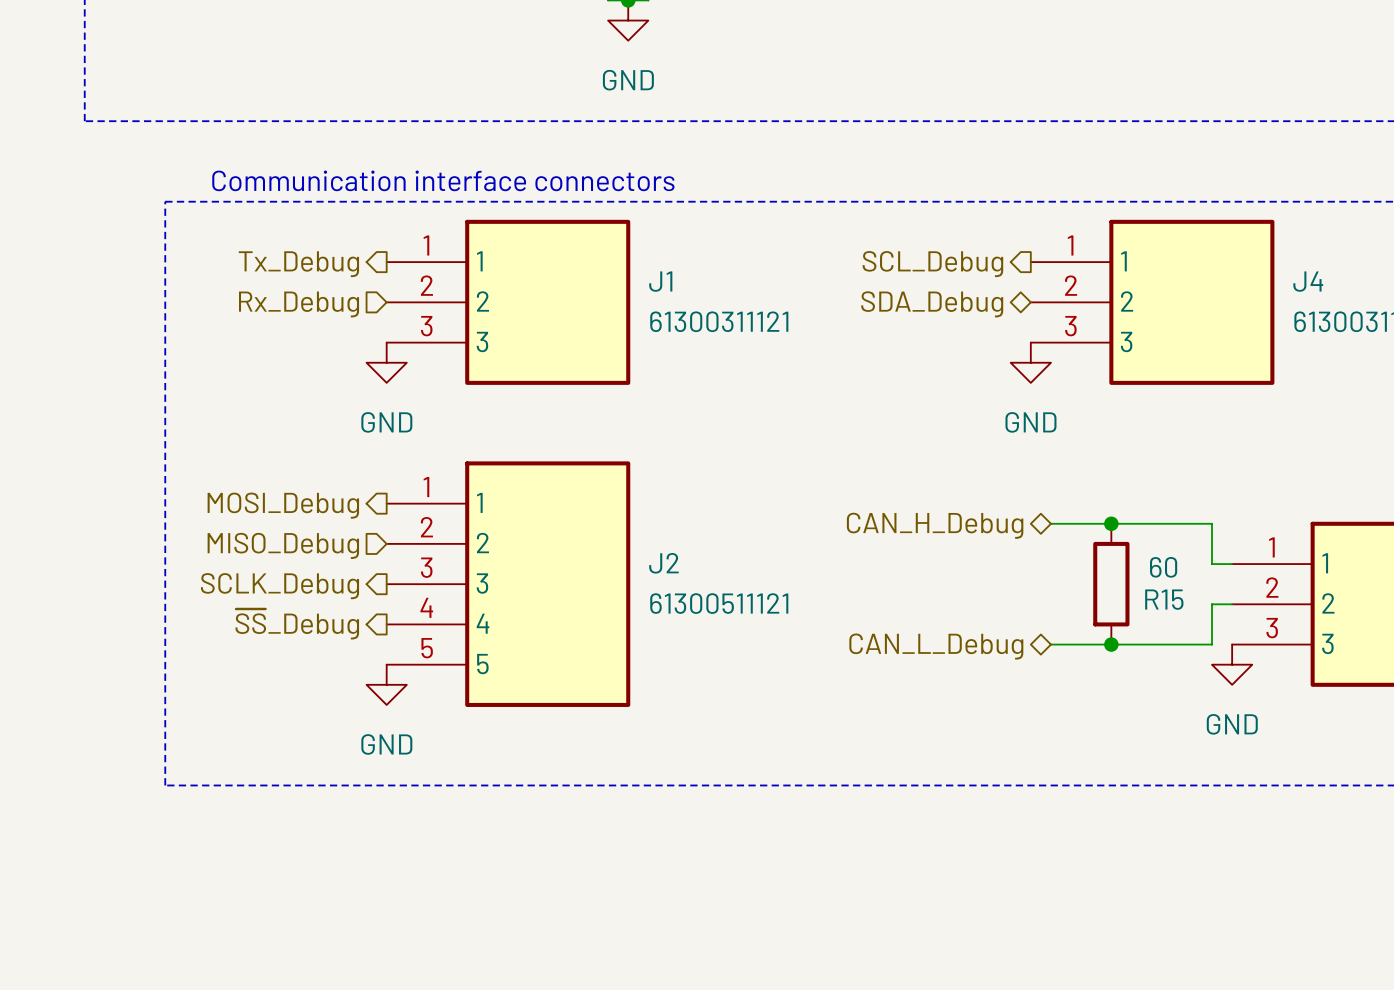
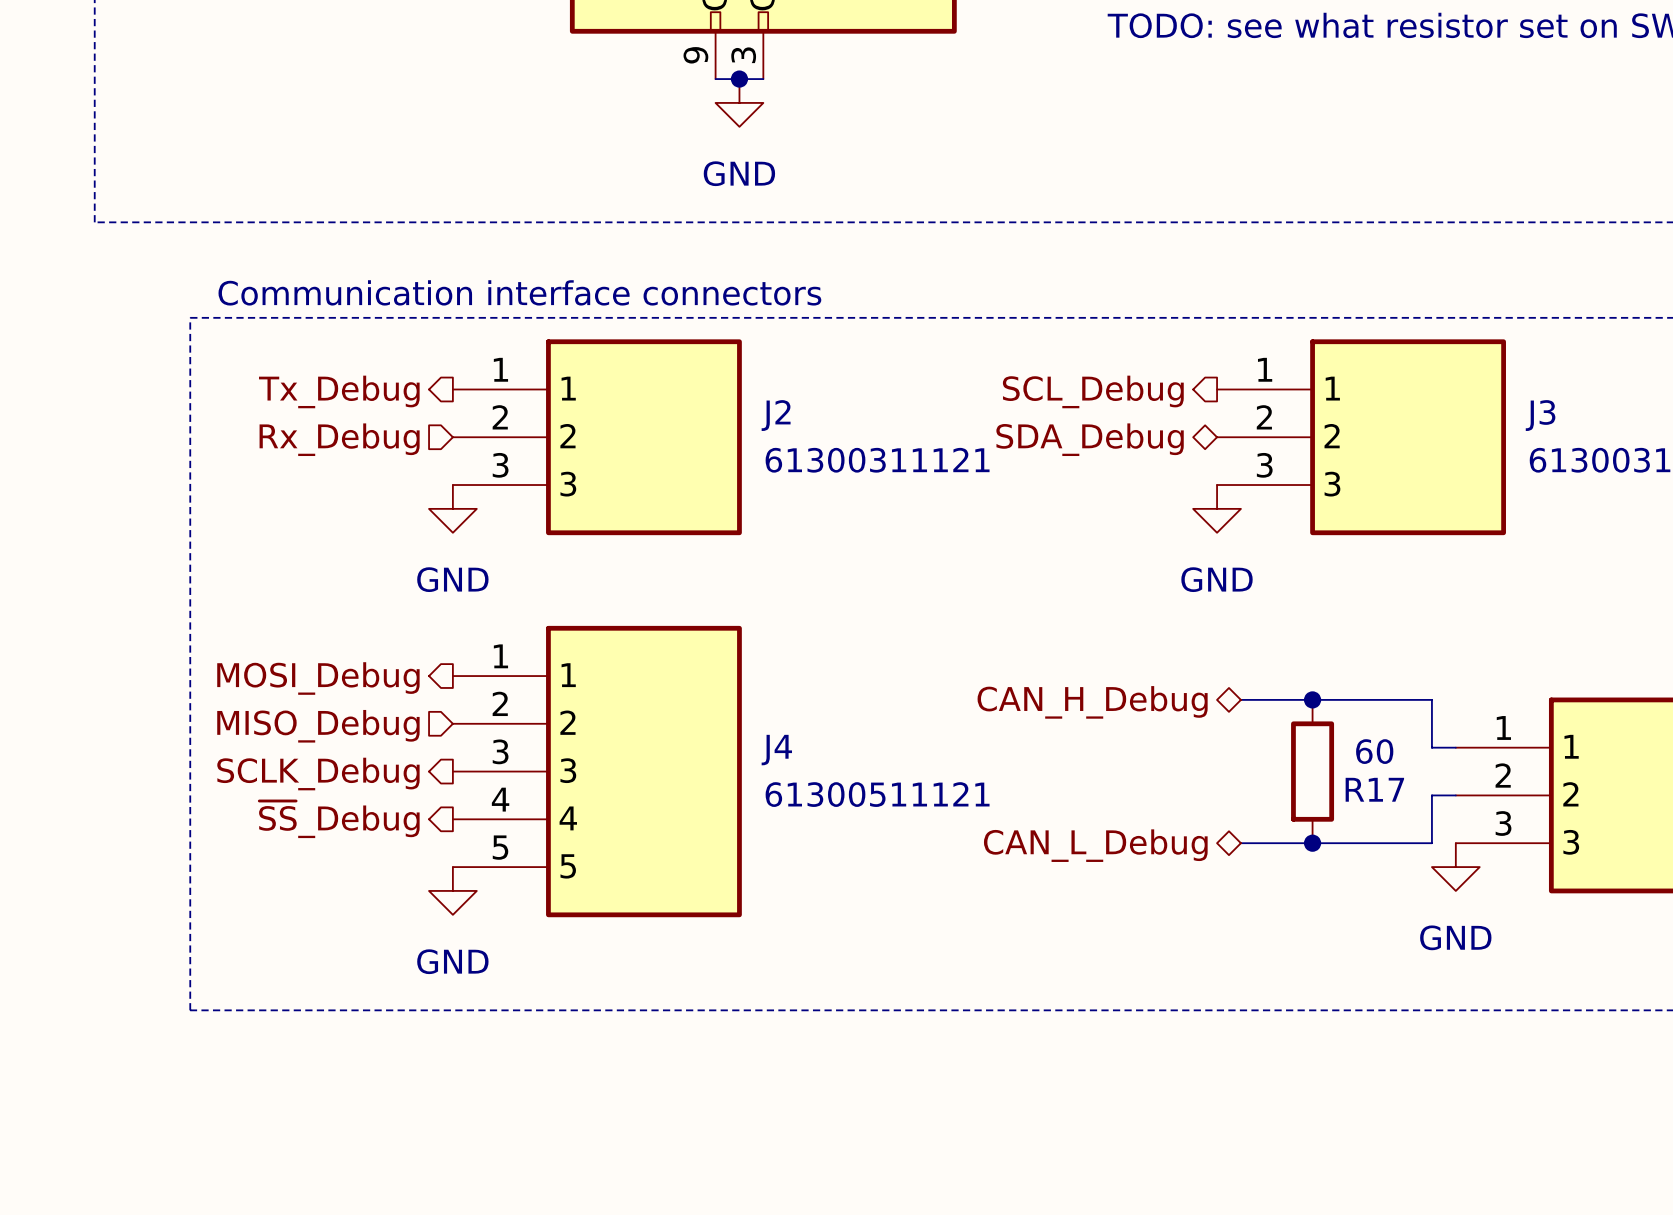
J1 name: J1 (660, 281) -> J2 (776, 415)
J4 name: J4 (1308, 281) -> J3 (1540, 415)
J2 name: J2 (663, 563) -> J4 (776, 750)
R15 name: R15 (1164, 599) -> R17 (1374, 789)

